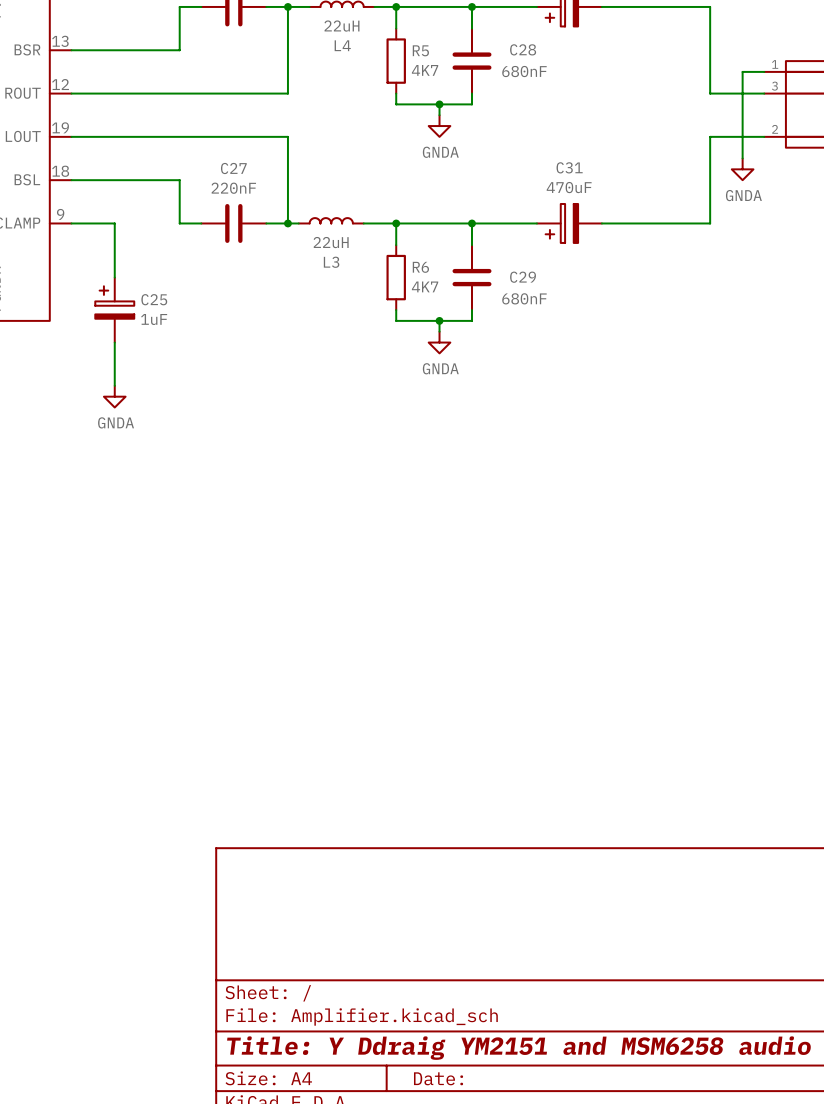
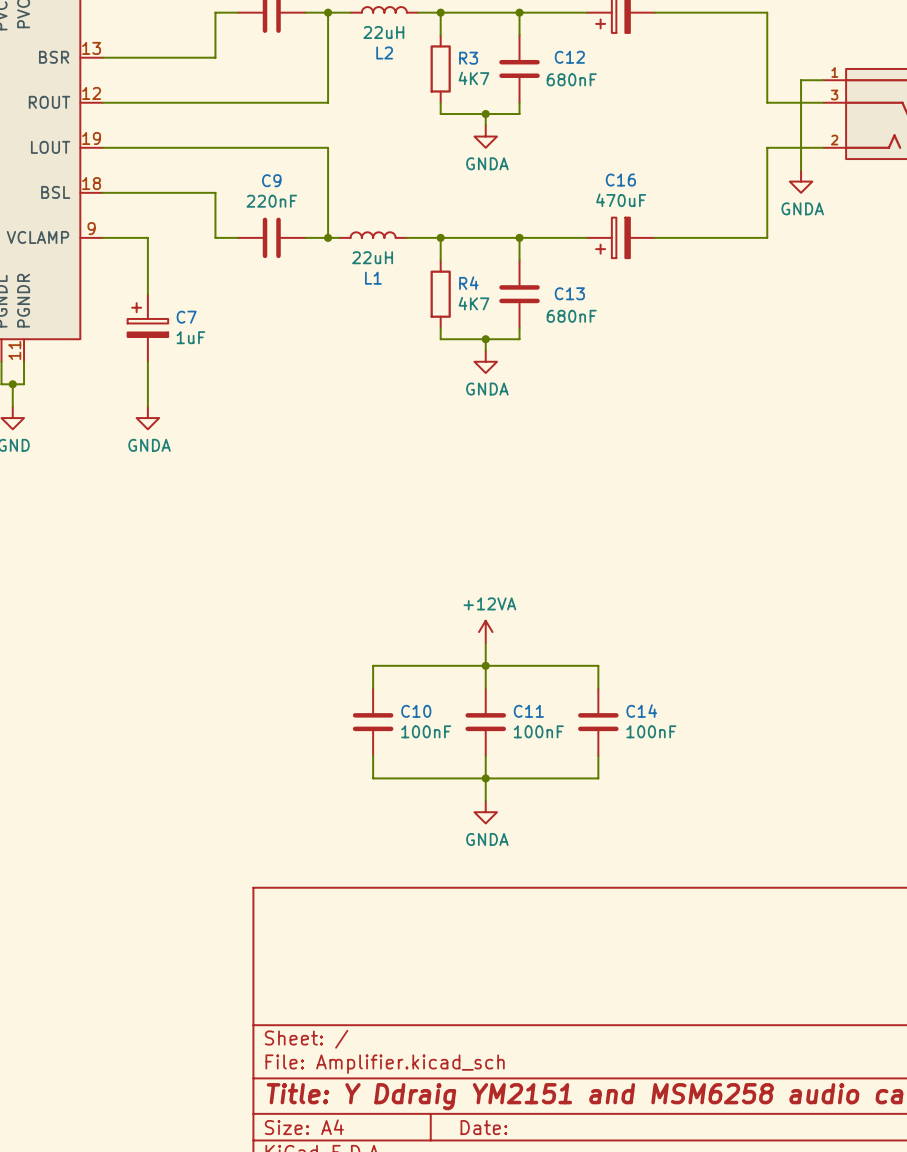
L4 name: L4 (342, 45) -> L2 (384, 53)
C28 name: C28 (523, 49) -> C12 (569, 57)
R5 name: R5 (420, 50) -> R3 (468, 58)
C31 name: C31 (569, 167) -> C16 (620, 180)
C27 name: C27 (233, 168) -> C9 (271, 180)
L3 name: L3 (331, 262) -> L1 (373, 278)
R6 name: R6 (420, 267) -> R4 (468, 283)
C29 name: C29 (523, 277) -> C13 (569, 293)
C25 name: C25 (154, 299) -> C7 (186, 317)
power symbol: none -> +12VA (485, 632)
wire: none -> (485, 643) (485, 688)
junction: none -> (485, 665)
wire: none -> (373, 688) (373, 665) (598, 665) (598, 688)
C10: none -> 100nF (373, 722)
C11: none -> 100nF (485, 722)
C14: none -> 100nF (598, 722)
wire: none -> (373, 755) (373, 778) (598, 778) (598, 755)
wire: none -> (485, 755) (485, 800)
junction: none -> (485, 778)
power symbol: none -> GNDA (485, 812)

